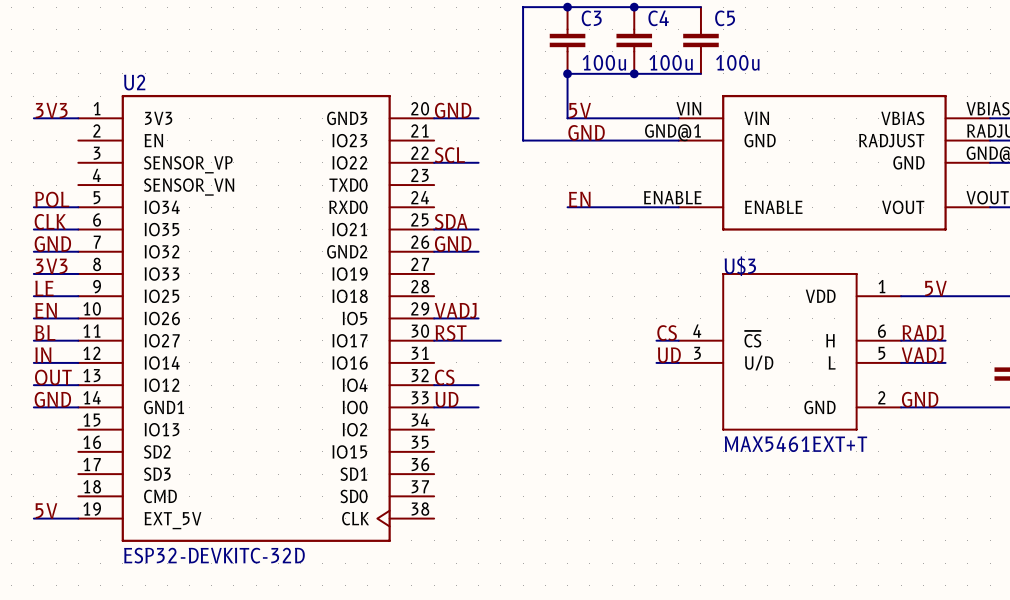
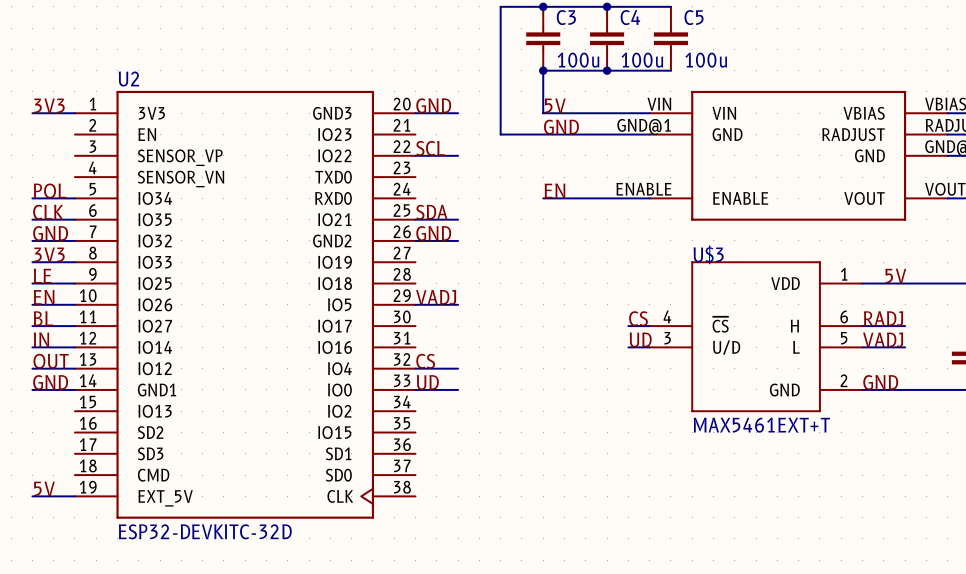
label: RST (451, 333) -> none
wire: (434, 340) (500, 340) -> none

